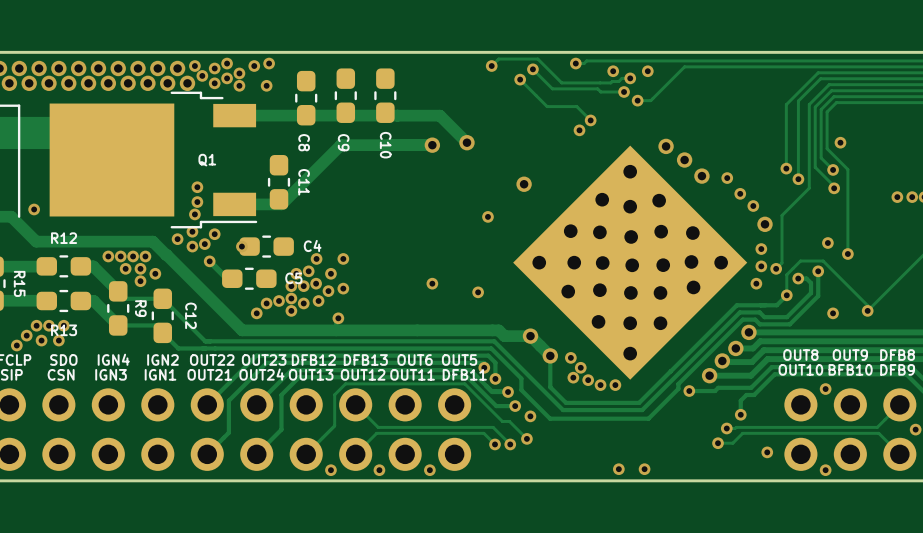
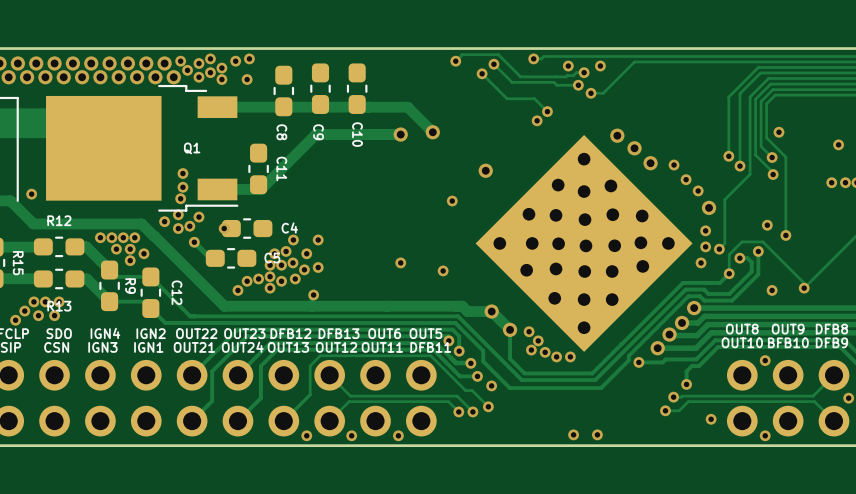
via: none -> (838, 144)

